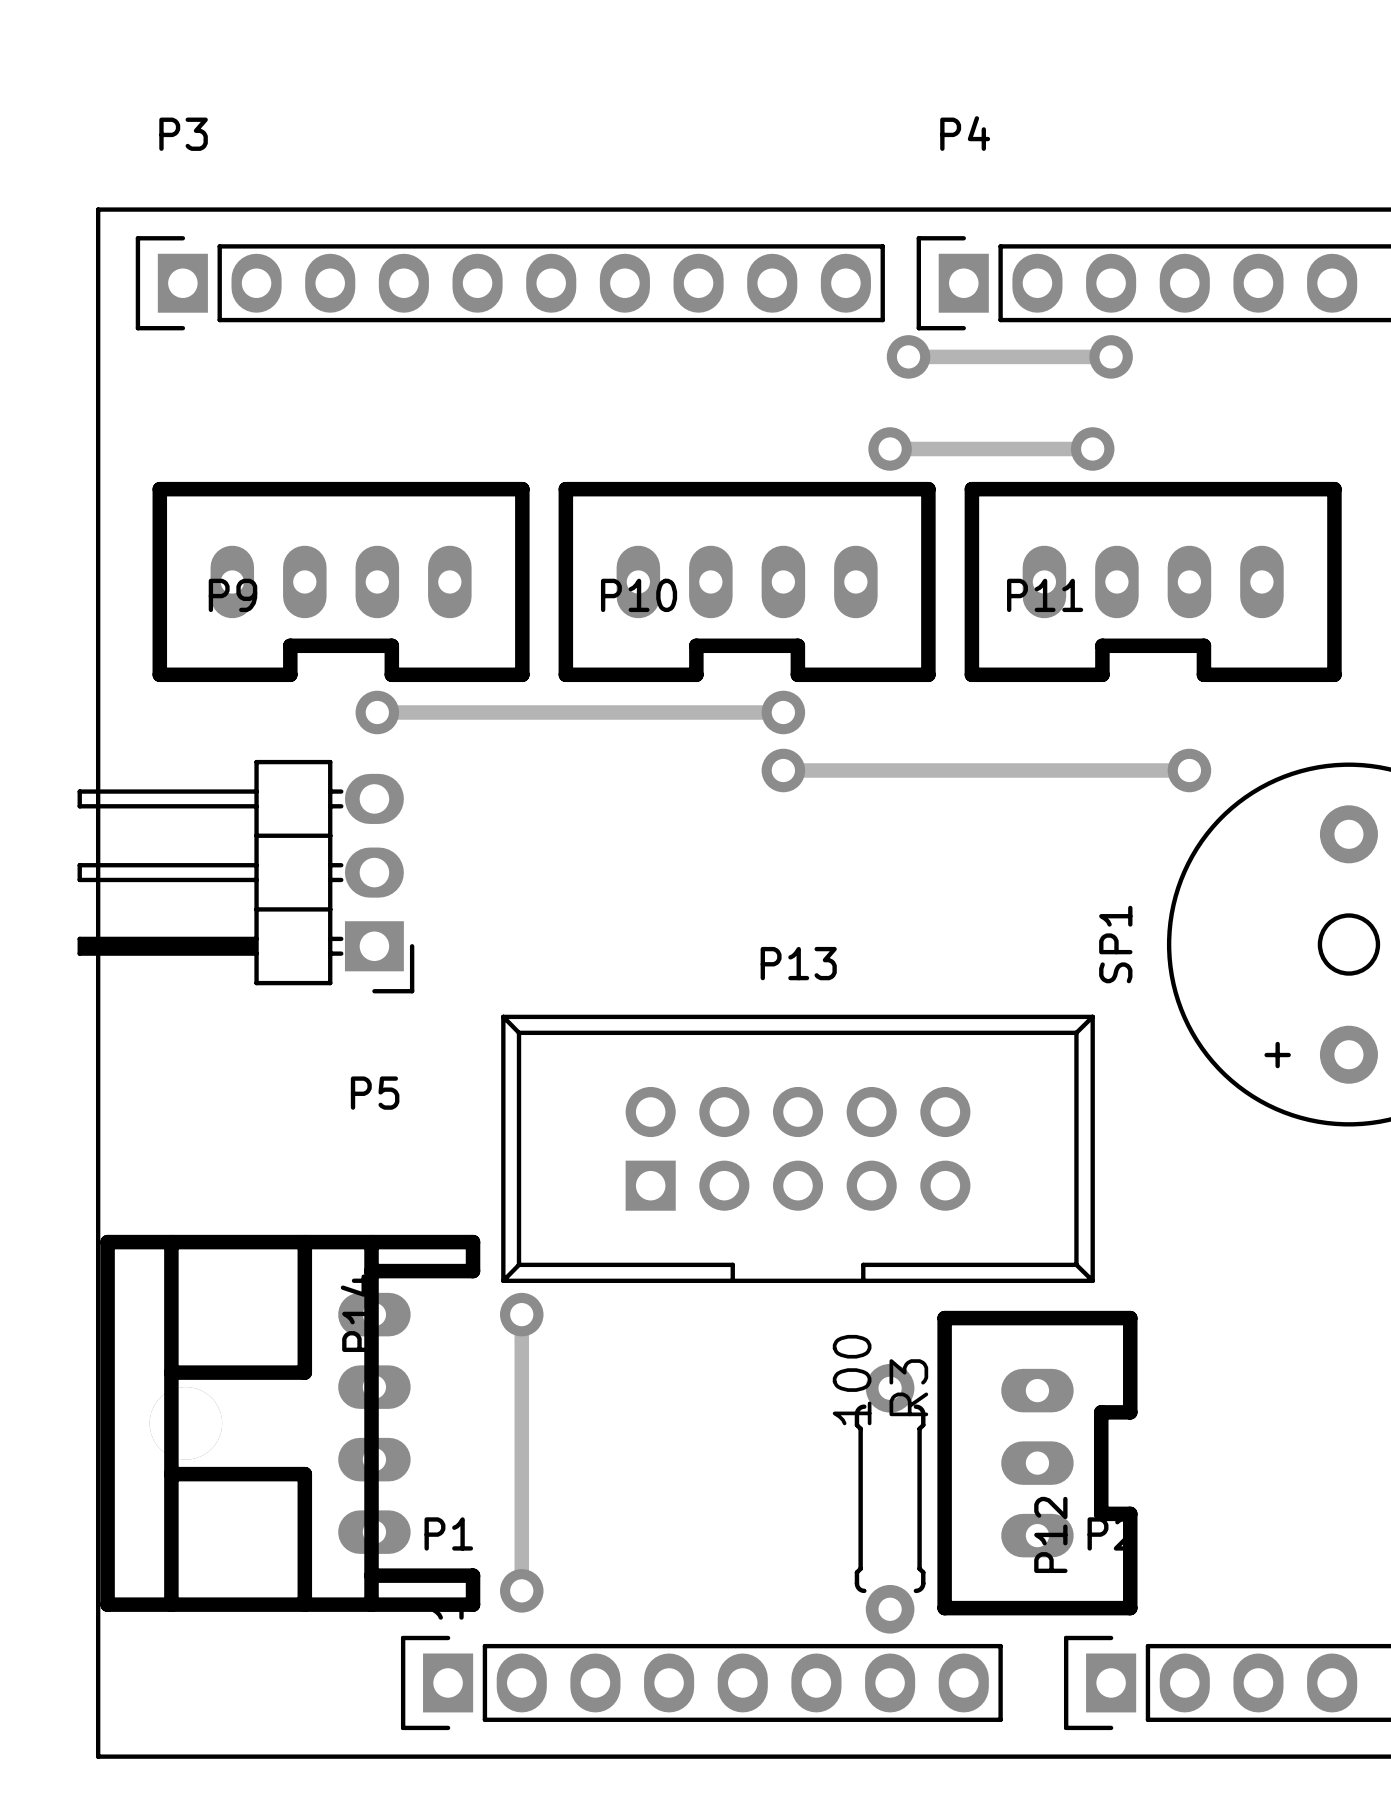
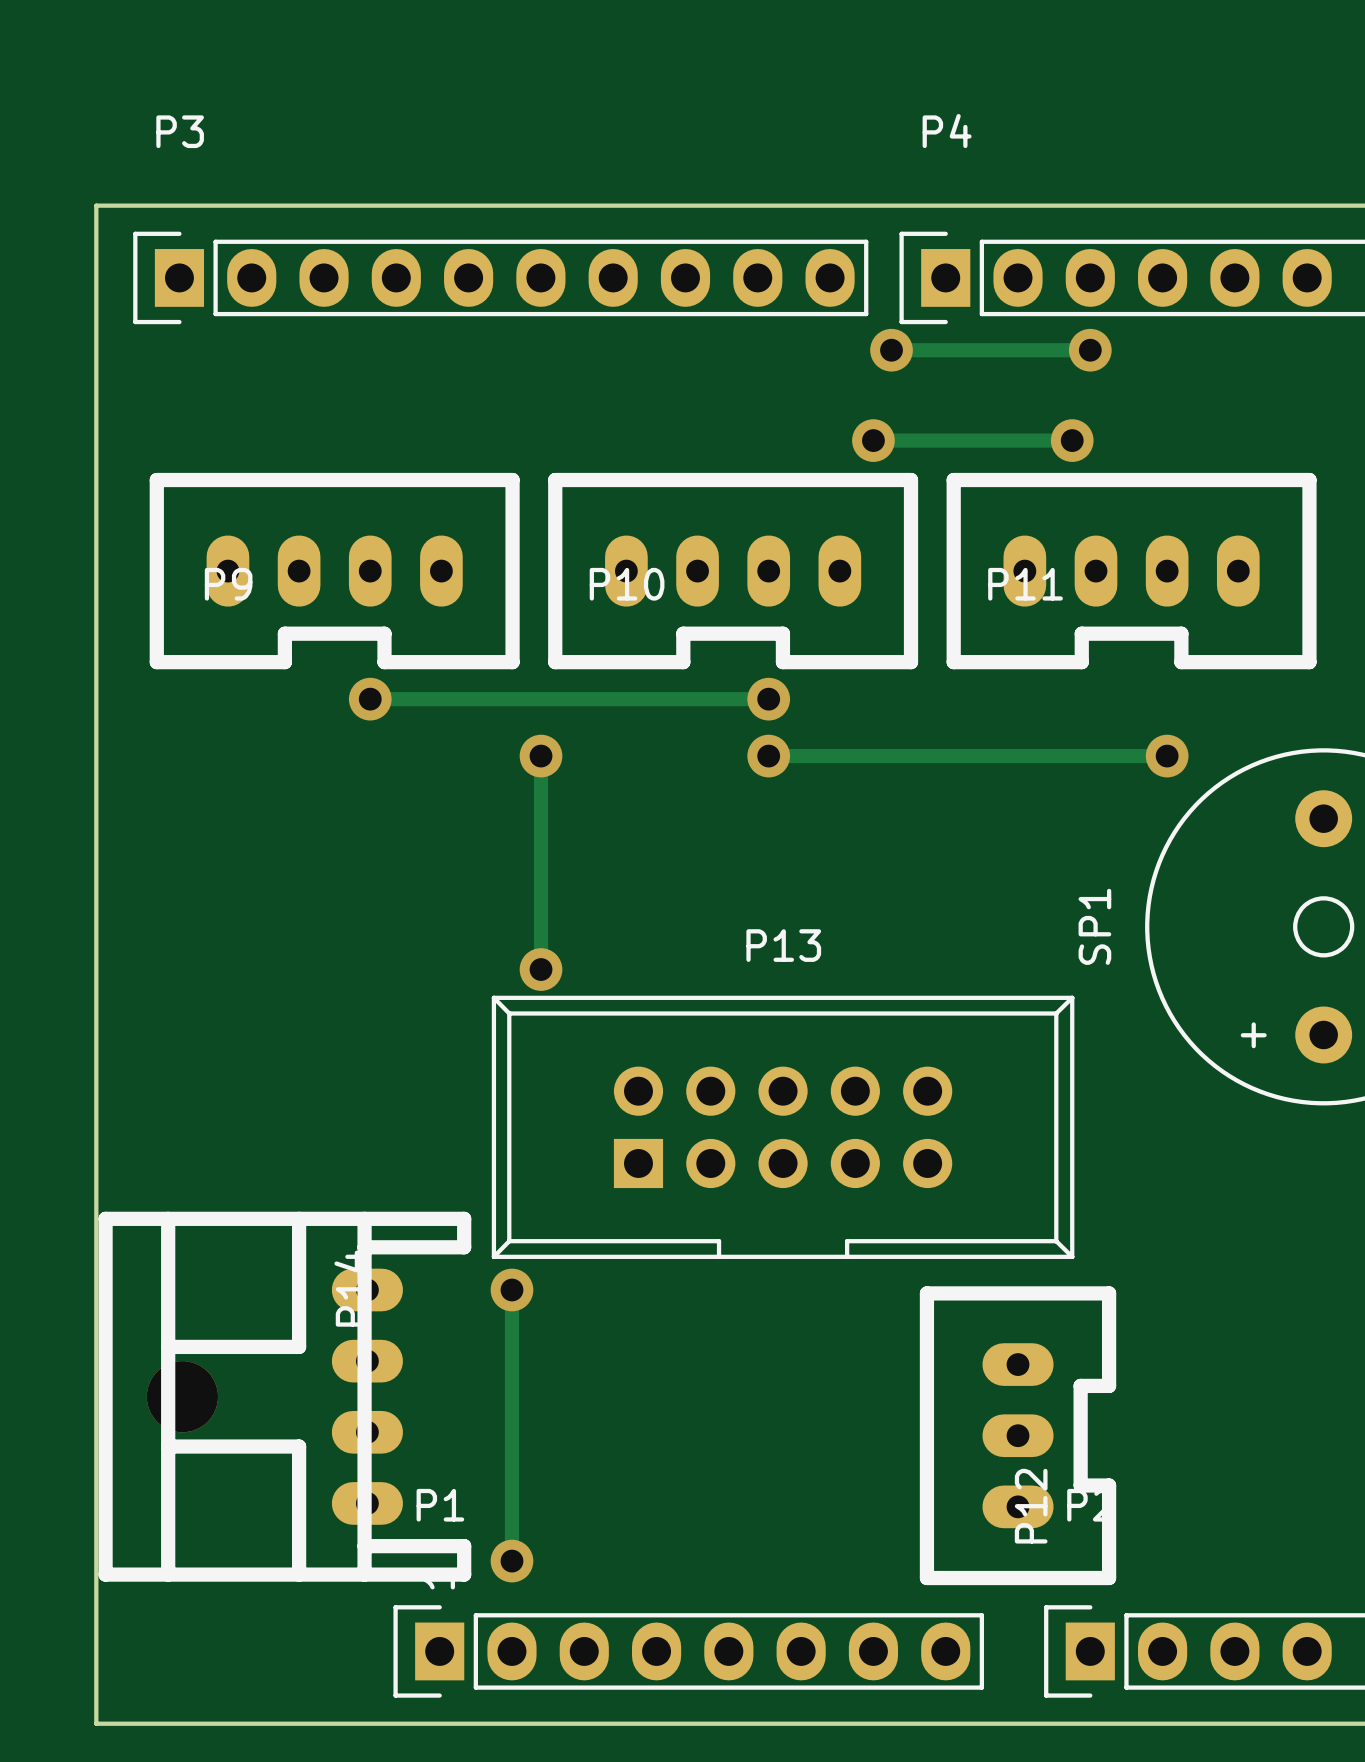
track: none -> (541, 756) (541, 969)
via: none -> (541, 756)
P5: (245, 876) -> none
via: none -> (541, 969)
R3: 100 (890, 1498) -> none

